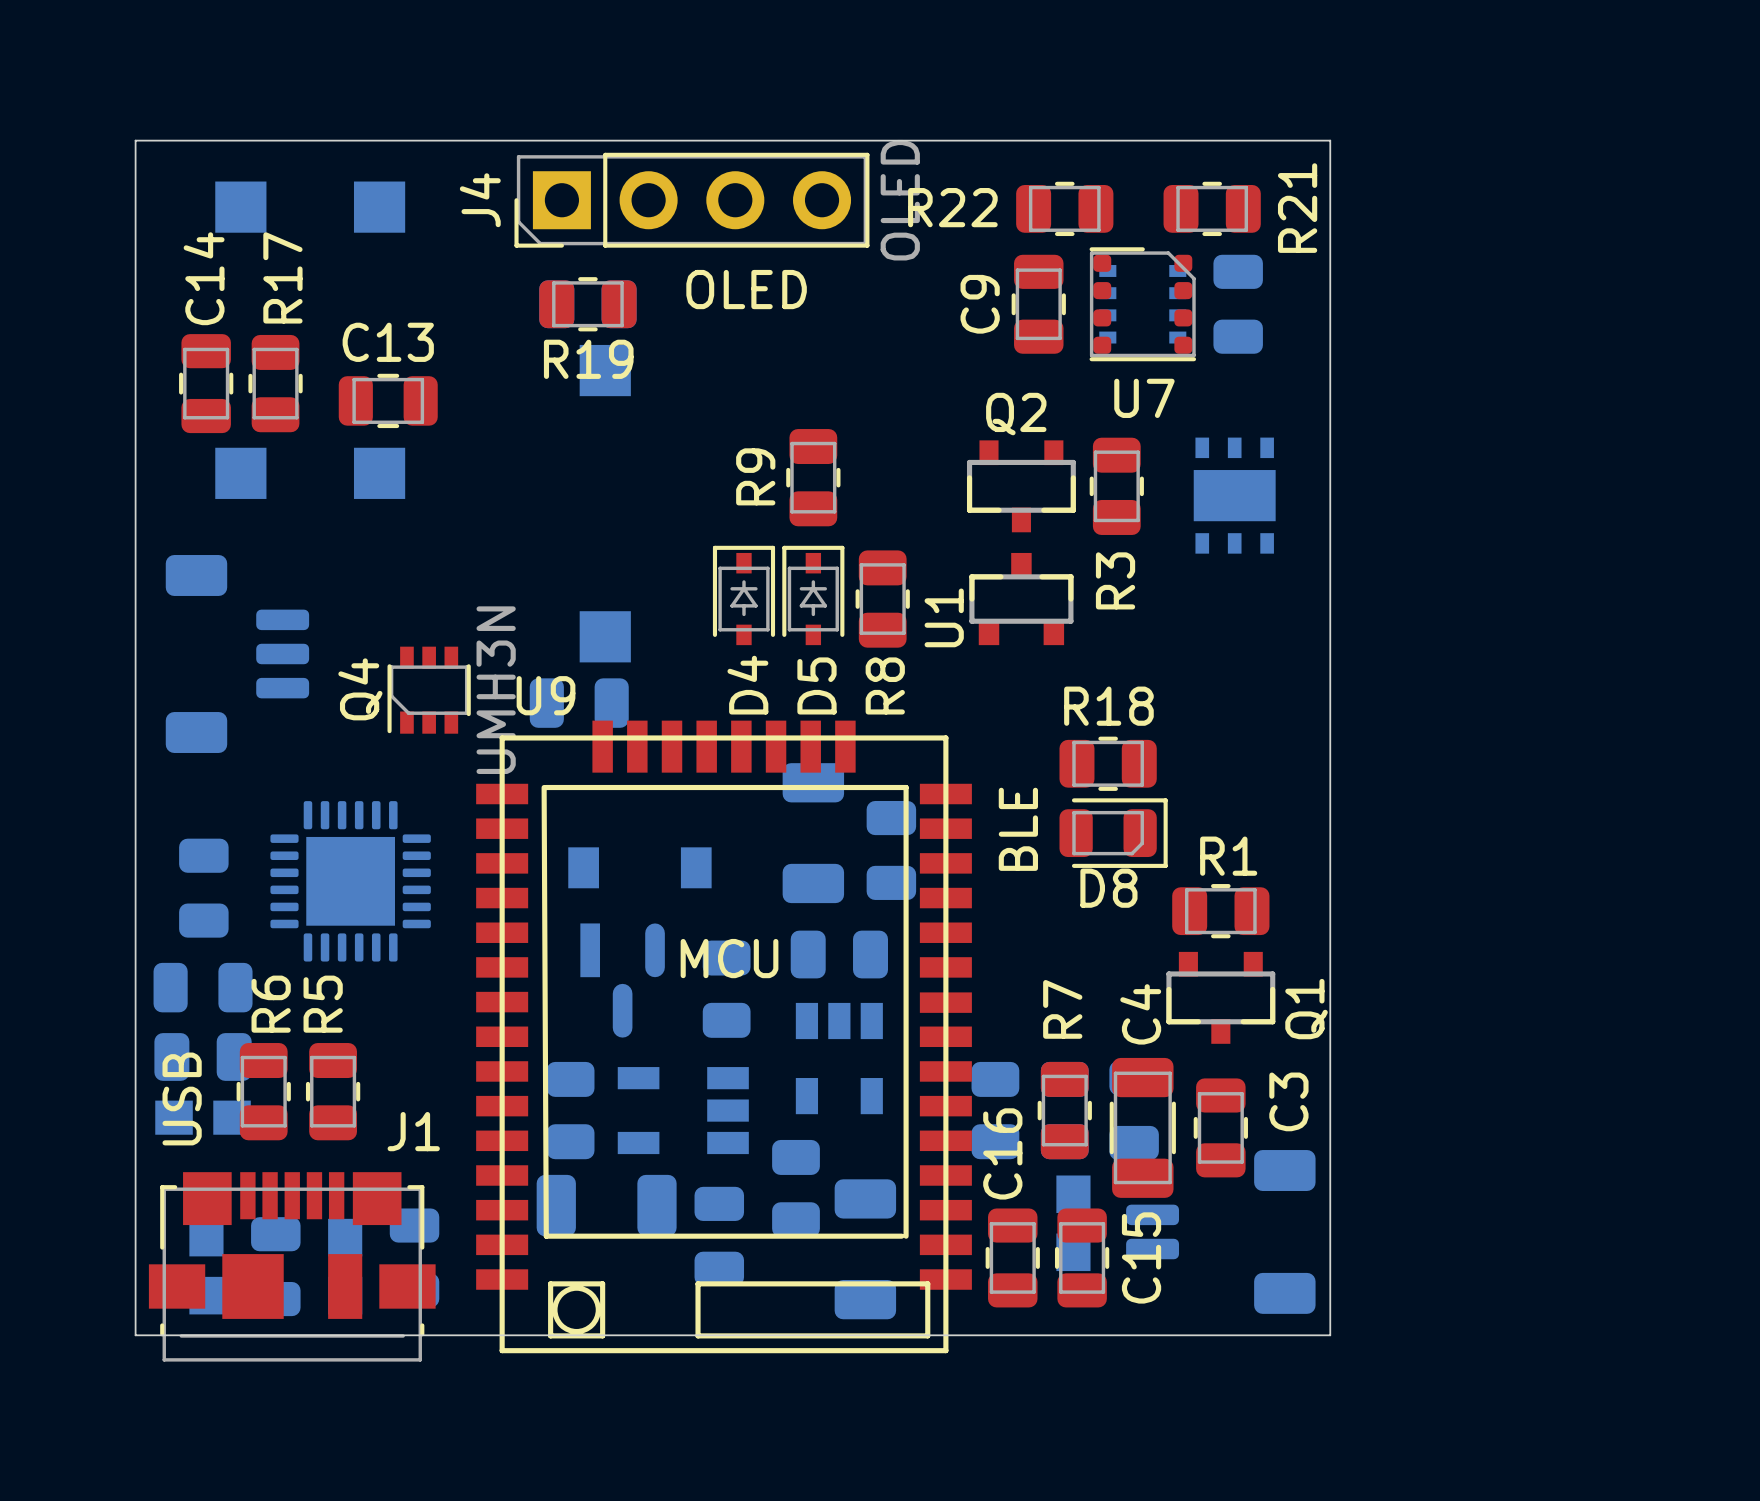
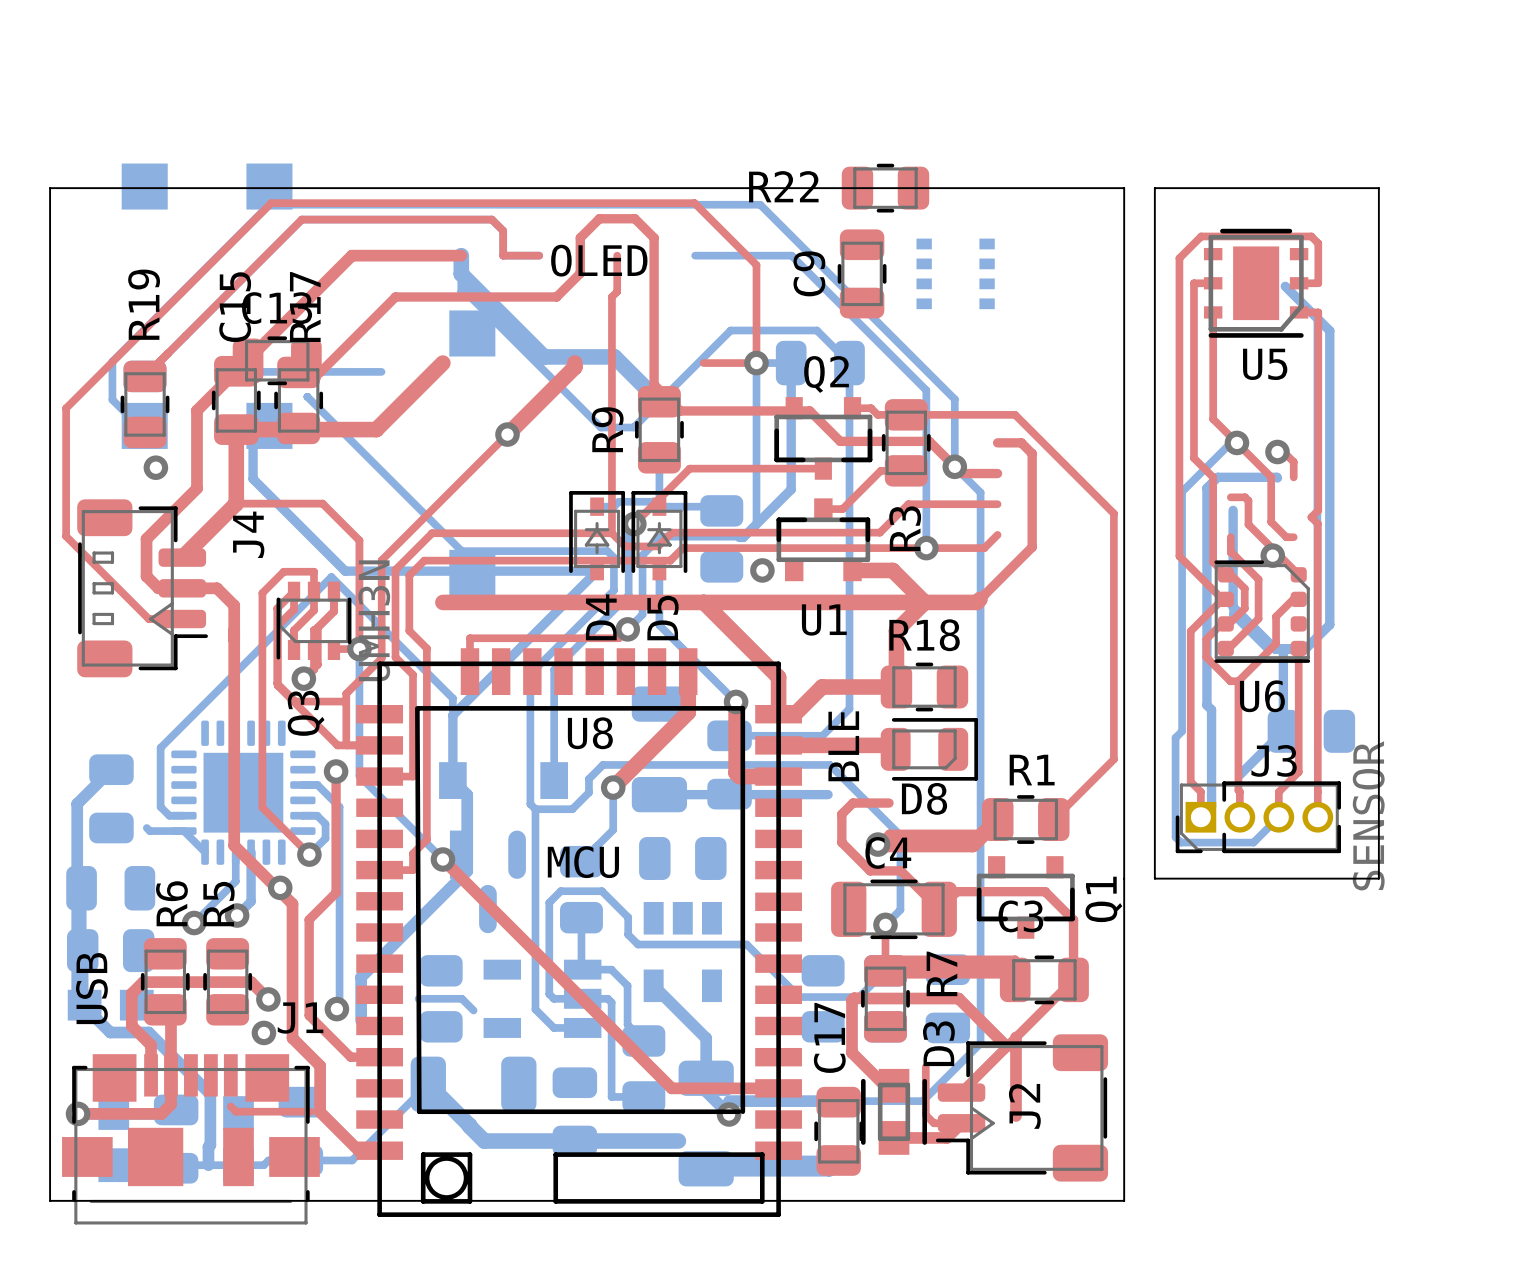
J4 footprint: [514, 152, 870, 248] -> [77, 499, 208, 678]
J4 name position: J4 (480, 200) -> J4 (248, 534)
J4 value: OLED (900, 200) -> none
board edge: (135, 208) (135, 140) (1330, 140) (1330, 208) -> (50, 188) (1124, 188)
R21 side: top (1212, 208) -> bottom (1311, 731)
board edge: none -> (1154, 188) (1154, 878) (1378, 878) (1378, 188) (1154, 188)
top track: none -> (461, 255) (351, 255) (196, 410) (196, 488) (146, 538) (146, 576) (158, 588) (217, 588) (234, 605) (234, 845) (292, 903) (292, 1038) (320, 1065) (320, 1112) (358, 1150) (379, 1150)
top track: none -> (539, 255) (503, 255) (503, 230) (491, 219) (301, 219) (145, 376)
top track: none -> (617, 255) (617, 291) (611, 296) (611, 533)
bottom track: none -> (695, 255) (791, 255) (926, 390) (926, 548)
R19 rotation: 0° (587, 304) -> 90° clockwise (145, 404)
R19 position: (587, 304) -> (145, 404)
U7: (1142, 304) -> none
part: (1238, 304) -> none
top track: none -> (1213, 283) (1193, 283) (1193, 458) (1213, 477) (1213, 562) (1225, 574) (1230, 574) (1244, 588) (1244, 608) (1229, 623) (1221, 623) (1206, 639) (1206, 657) (1230, 681) (1238, 681)
top track: none -> (1299, 283) (1318, 283) (1318, 243) (1311, 236) (1201, 236) (1179, 258) (1179, 556) (1222, 599)
bottom track: none -> (1285, 286) (1317, 318) (1317, 636) (1304, 648) (1267, 648) (1233, 614) (1233, 510) (1233, 607) (1275, 648) (1305, 648) (1329, 624) (1329, 330) (1285, 286)
top track: none -> (1213, 312) (1213, 419) (1271, 477) (1271, 522) (1286, 537) (1293, 537)
top track: none -> (1299, 312) (1318, 312) (1318, 510) (1311, 517) (1317, 523) (1317, 817)
R19 name position: R19 (588, 359) -> R19 (144, 304)
C14: (206, 383) -> none
R17 position: (275, 383) -> (298, 400)
top track: none -> (442, 363) (376, 429) (236, 429)
top track: none -> (574, 363) (574, 367) (381, 560) (381, 658) (346, 693) (346, 745) (379, 745) (337, 745) (277, 685) (277, 625) (294, 609) (294, 591) (277, 608) (277, 683) (295, 701) (346, 701)
top track: none -> (703, 363) (756, 363) (756, 265) (694, 203) (271, 203) (66, 408) (66, 536) (148, 619) (182, 619)
via: none -> (756, 363)
part: none -> (820, 363)
bottom track: none -> (253, 367) (253, 371) (381, 371)
top track: none -> (298, 372) (320, 372) (395, 296) (556, 296) (580, 273) (580, 237) (599, 218) (634, 218) (654, 237) (654, 384) (680, 410) (809, 410) (840, 441) (929, 441) (961, 473) (997, 473)
bottom track: none -> (307, 396) (461, 551) (607, 551) (613, 557) (613, 590) (530, 674) (530, 804) (535, 809)
bottom track: none -> (659, 401) (614, 356) (544, 356) (461, 274) (461, 255) (461, 291) (465, 291) (600, 427) (633, 427) (730, 330) (816, 330) (849, 363) (849, 708) (822, 735) (729, 735)
top track: none -> (852, 408) (871, 408) (877, 414) (1015, 414) (1113, 513) (1113, 759) (1053, 819)
top track: none -> (236, 429) (236, 503)
bottom track: none -> (145, 432) (112, 399) (112, 361) (269, 204) (760, 204) (954, 399) (954, 466) (980, 492) (980, 1043) (922, 1101) (729, 1101) (729, 1114) (706, 1091) (706, 1038) (653, 985)
via: none -> (507, 434)
bottom track: none -> (253, 435) (253, 425) (253, 478) (345, 571) (597, 571)
Q2 position: (1021, 486) -> (823, 438)
R3 position: (1116, 486) -> (906, 442)
top track: none -> (997, 442) (1021, 442) (1032, 453) (1032, 547) (976, 602) (442, 602) (703, 602) (778, 677) (778, 714) (794, 714) (822, 687) (896, 687)
bottom track: none -> (1236, 442) (1230, 442) (1182, 491) (1182, 731) (1175, 737) (1175, 837) (1181, 842) (1253, 842) (1278, 817)
via: none -> (1236, 442)
U5 side: bottom (1234, 495) -> top (1256, 283)
top track: none -> (1277, 451) (1283, 451) (1293, 462) (1293, 477)
via: none -> (1277, 451)
bottom track: none -> (659, 457) (659, 506) (717, 506) (721, 510)
via: none -> (954, 466)
via: none -> (155, 467)
top track: none -> (823, 468) (689, 468) (634, 524)
top track: none -> (906, 470) (880, 470) (842, 509) (823, 509)
bottom track: none -> (1277, 478) (1217, 477) (1206, 488) (1206, 705) (1211, 709) (1211, 806) (1200, 817)
top track: none -> (1230, 497) (1245, 497) (1248, 500) (1248, 524) (1298, 574)
bottom track: none -> (659, 501) (618, 501) (613, 506) (597, 506)
top track: none -> (236, 503) (182, 557)
top track: none -> (236, 503) (322, 503) (359, 540) (359, 649) (333, 650)
top track: none -> (997, 504) (908, 504) (879, 532) (671, 532) (658, 546) (625, 546) (611, 533)
via: none -> (634, 524)
bottom track: none -> (628, 529) (628, 595) (554, 669) (554, 780)
top track: none -> (611, 533) (432, 533) (395, 569) (395, 657) (412, 674) (412, 776) (379, 776)
top track: none -> (997, 534) (984, 548) (682, 548) (670, 560) (424, 560) (409, 575) (409, 630) (426, 648) (426, 839) (412, 853) (412, 870) (379, 870)
bottom track: none -> (739, 537) (743, 537) (791, 489) (791, 363) (756, 363) (756, 524) (744, 536) (661, 536) (642, 555) (642, 614) (627, 629)
top track: none -> (1230, 537) (1230, 552) (1258, 579) (1258, 618) (1228, 648) (1225, 648)
R8 side: top (882, 599) -> bottom (721, 538)
U1 position: (1021, 599) -> (823, 539)
via: none -> (926, 548)
U1 name rotation: 0° (944, 617) -> 90° clockwise (824, 619)
U1 name position: U1 (944, 617) -> U1 (824, 619)
via: none -> (1272, 555)
bottom track: none -> (597, 571) (452, 715) (452, 780)
bottom track: none -> (659, 571) (659, 625) (736, 701)
via: none -> (762, 570)
top track: none -> (852, 570) (892, 570) (924, 602) (896, 630) (896, 687)
part: (237, 654) -> none
top track: none -> (333, 591) (333, 611) (315, 630) (313, 630) (313, 669) (303, 678) (317, 664) (317, 627) (333, 611) (333, 591)
top track: none -> (1222, 599) (1190, 631) (1190, 781) (1200, 791) (1200, 817)
top track: none -> (1298, 599) (1293, 599) (1276, 616) (1276, 643) (1238, 681)
U6: none -> (1262, 611)
Q4 name: Q4 (360, 689) -> Q3 (306, 713)
U9 name: U9 (546, 695) -> U8 (590, 733)
top track: none -> (627, 629) (618, 638) (469, 638) (469, 671)
via: none -> (627, 629)
part: (579, 703) -> none
top track: none -> (1298, 648) (1298, 772) (1278, 791) (1278, 817)
bottom track: none -> (359, 649) (359, 775) (442, 859)
via: none -> (359, 649)
bottom track: none -> (1283, 648) (1283, 731) (1239, 774)
top track: none -> (294, 650) (294, 630) (313, 610) (313, 571) (283, 571) (262, 593) (262, 807) (309, 854)
top track: none -> (688, 671) (688, 712) (613, 787)
via: none -> (303, 678)
top track: none -> (1238, 681) (1239, 817)
top track: none -> (736, 701) (736, 773) (739, 776) (778, 776)
via: none -> (736, 701)
top track: none -> (778, 745) (891, 745) (895, 749)
top track: none -> (336, 771) (336, 892) (309, 919) (309, 1015) (350, 1057) (379, 1057)
via: none -> (336, 771)
bottom track: none -> (452, 780) (452, 698) (331, 576) (160, 747) (160, 806) (169, 815) (183, 815)
bottom track: none -> (452, 780) (467, 794) (467, 871) (361, 977) (361, 1020)
bottom track: none -> (302, 785) (317, 785) (339, 807) (339, 1006) (336, 1009)
bottom track: none -> (613, 787) (613, 829) (581, 861) (597, 845)
via: none -> (613, 787)
bottom track: none -> (659, 794) (828, 794)
top track: none -> (889, 803) (852, 803) (841, 814) (841, 842) (870, 870) (900, 870) (939, 909) (956, 891) (1045, 891) (1073, 920) (1073, 979) (961, 1091) (961, 1092) (1004, 1048)
bottom track: none -> (535, 809) (535, 1009) (554, 1027) (582, 1027)
bottom track: none -> (535, 809) (572, 809) (588, 792) (588, 778) (602, 764) (829, 764) (900, 835) (900, 909) (885, 924)
bottom track: none -> (302, 815) (317, 815) (325, 824) (325, 838) (309, 854)
J3: none -> SENSOR (1258, 817)
top track: none -> (997, 819) (983, 833) (889, 833) (878, 844) (972, 844) (997, 819)
bottom track: none -> (146, 827) (149, 831) (183, 831) (205, 852)
via: none -> (878, 844)
bottom track: none -> (235, 852) (235, 881) (194, 923)
bottom track: none -> (251, 852) (251, 901) (237, 915)
via: none -> (309, 854)
top track: none -> (442, 859) (671, 1088) (778, 1088)
via: none -> (442, 859)
via: none -> (280, 887)
R7 name position: R7 (1062, 1009) -> R7 (941, 973)
via: none -> (237, 915)
bottom track: none -> (581, 917) (581, 968) (611, 969) (627, 985) (627, 1024) (643, 1040) (635, 1032)
via: none -> (194, 923)
top track: none -> (885, 924) (885, 970) (1006, 970) (1015, 979) (1015, 959) (885, 959)
via: none -> (885, 924)
bottom track: none -> (885, 970) (859, 997) (799, 997) (746, 944) (638, 944) (628, 934) (628, 917) (601, 891) (560, 891) (549, 902) (549, 994) (554, 998) (607, 998) (611, 1002) (611, 1096) (643, 1096)
C3 name position: C3 (1288, 1101) -> C3 (1020, 916)
bottom track: none -> (418, 998) (461, 998) (473, 1010)
top track: none -> (863, 998) (854, 998) (852, 1000) (852, 1052) (885, 1085) (894, 1085)
top track: none -> (863, 998) (958, 998) (1006, 1046)
top track: none -> (268, 999) (251, 982) (143, 982) (131, 993) (131, 1026) (151, 1045) (151, 1075)
via: none -> (268, 999)
bottom track: none -> (84, 1005) (82, 889) (78, 885) (78, 802) (111, 769) (77, 803) (77, 999) (110, 1032) (148, 1032) (210, 1094) (208, 1165)
via: none -> (336, 1009)
C4 rotation: 0° (1142, 1127) -> 90° clockwise (894, 909)
C4 position: (1142, 1127) -> (894, 909)
C3 rotation: 0° (1220, 1127) -> 90° clockwise (1044, 979)
top track: none -> (170, 1015) (170, 1104) (161, 1113) (78, 1113)
via: none -> (263, 1032)
C16 name: C16 (1002, 1153) -> C17 (829, 1037)
top track: none -> (1015, 1037) (1015, 1116)
top track: none -> (925, 1067) (925, 1115) (933, 1123) (961, 1123) (946, 1137) (894, 1137) (919, 1137)
D3 side: bottom (1073, 1223) -> top (894, 1111)
top track: none -> (230, 1106) (236, 1111) (310, 1111)
J2 side: bottom (1220, 1231) -> top (1021, 1107)
via: none -> (78, 1113)
via: none -> (729, 1114)
C15 position: (1082, 1257) -> (236, 400)
C15 name position: C15 (1141, 1257) -> C15 (235, 307)
bottom track: none -> (678, 1141) (484, 1141) (428, 1084) (352, 1160) (268, 1160) (263, 1165) (177, 1165) (176, 1168)
bottom track: none -> (706, 1159) (838, 1159) (829, 1168) (706, 1168) (706, 1159)

